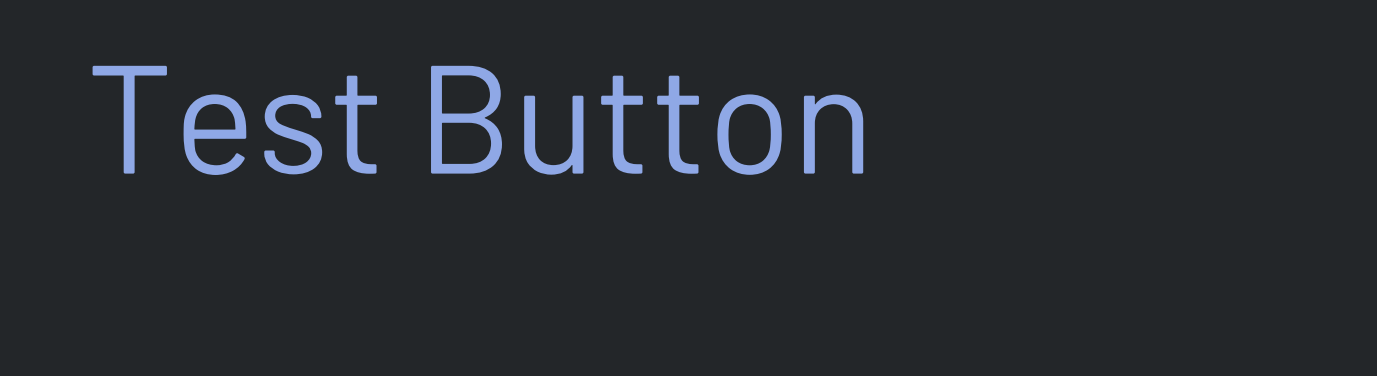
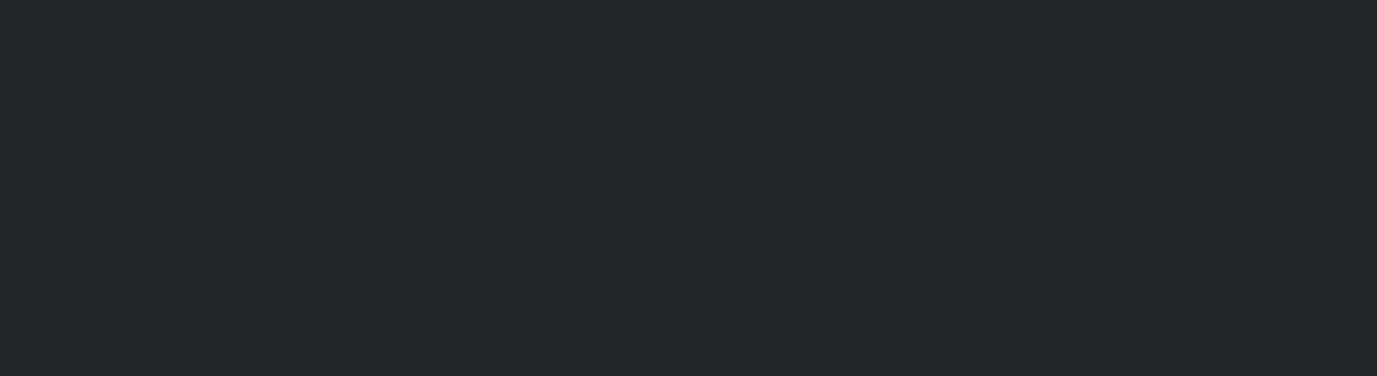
text: Test Button (477, 120) -> none

